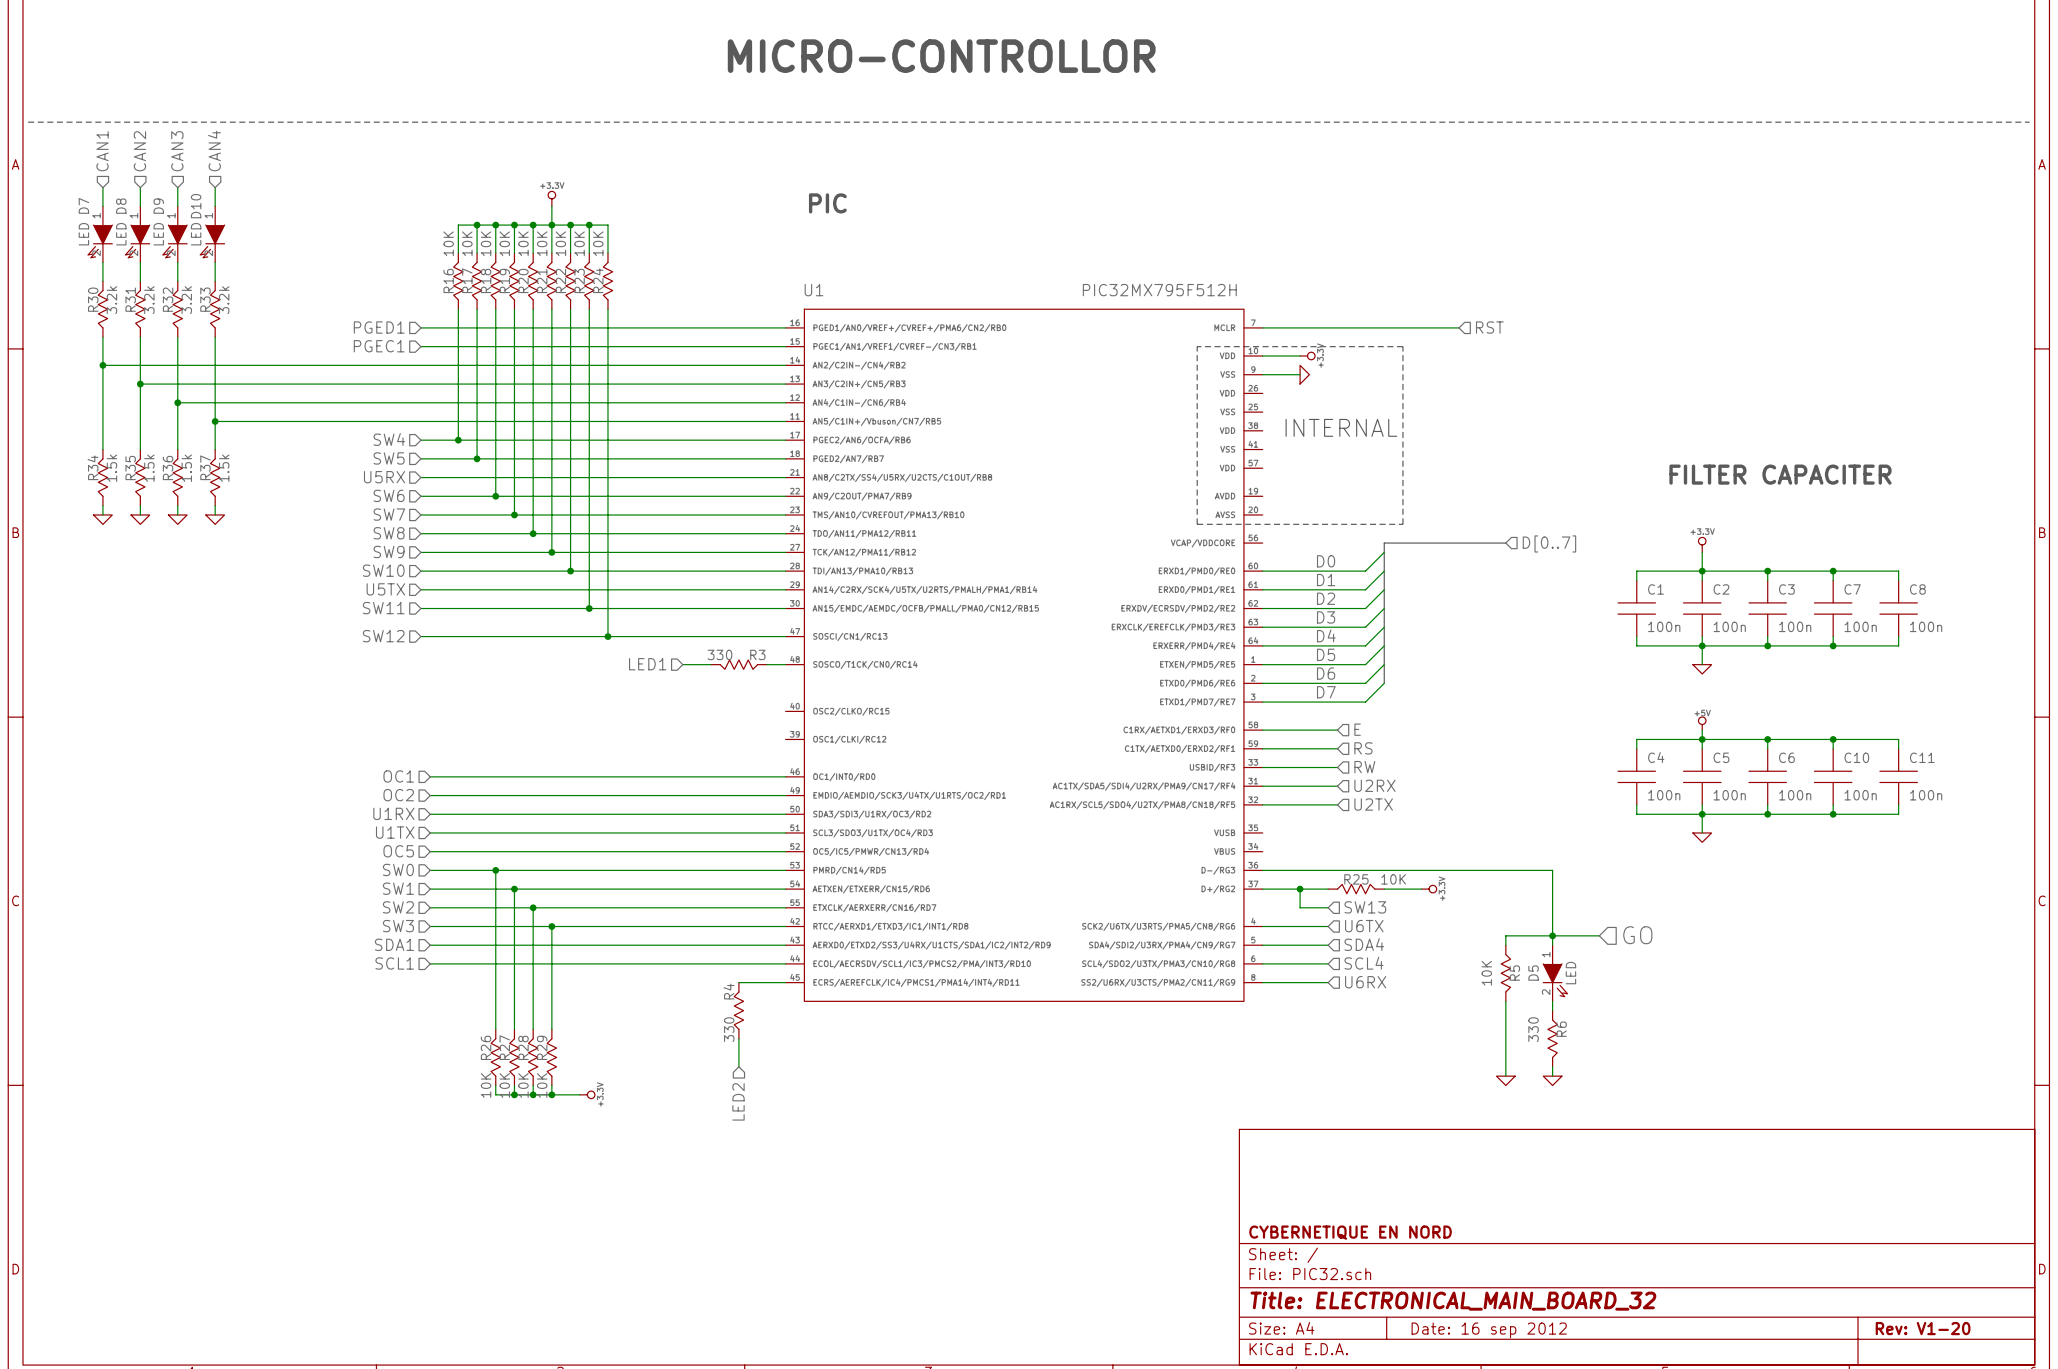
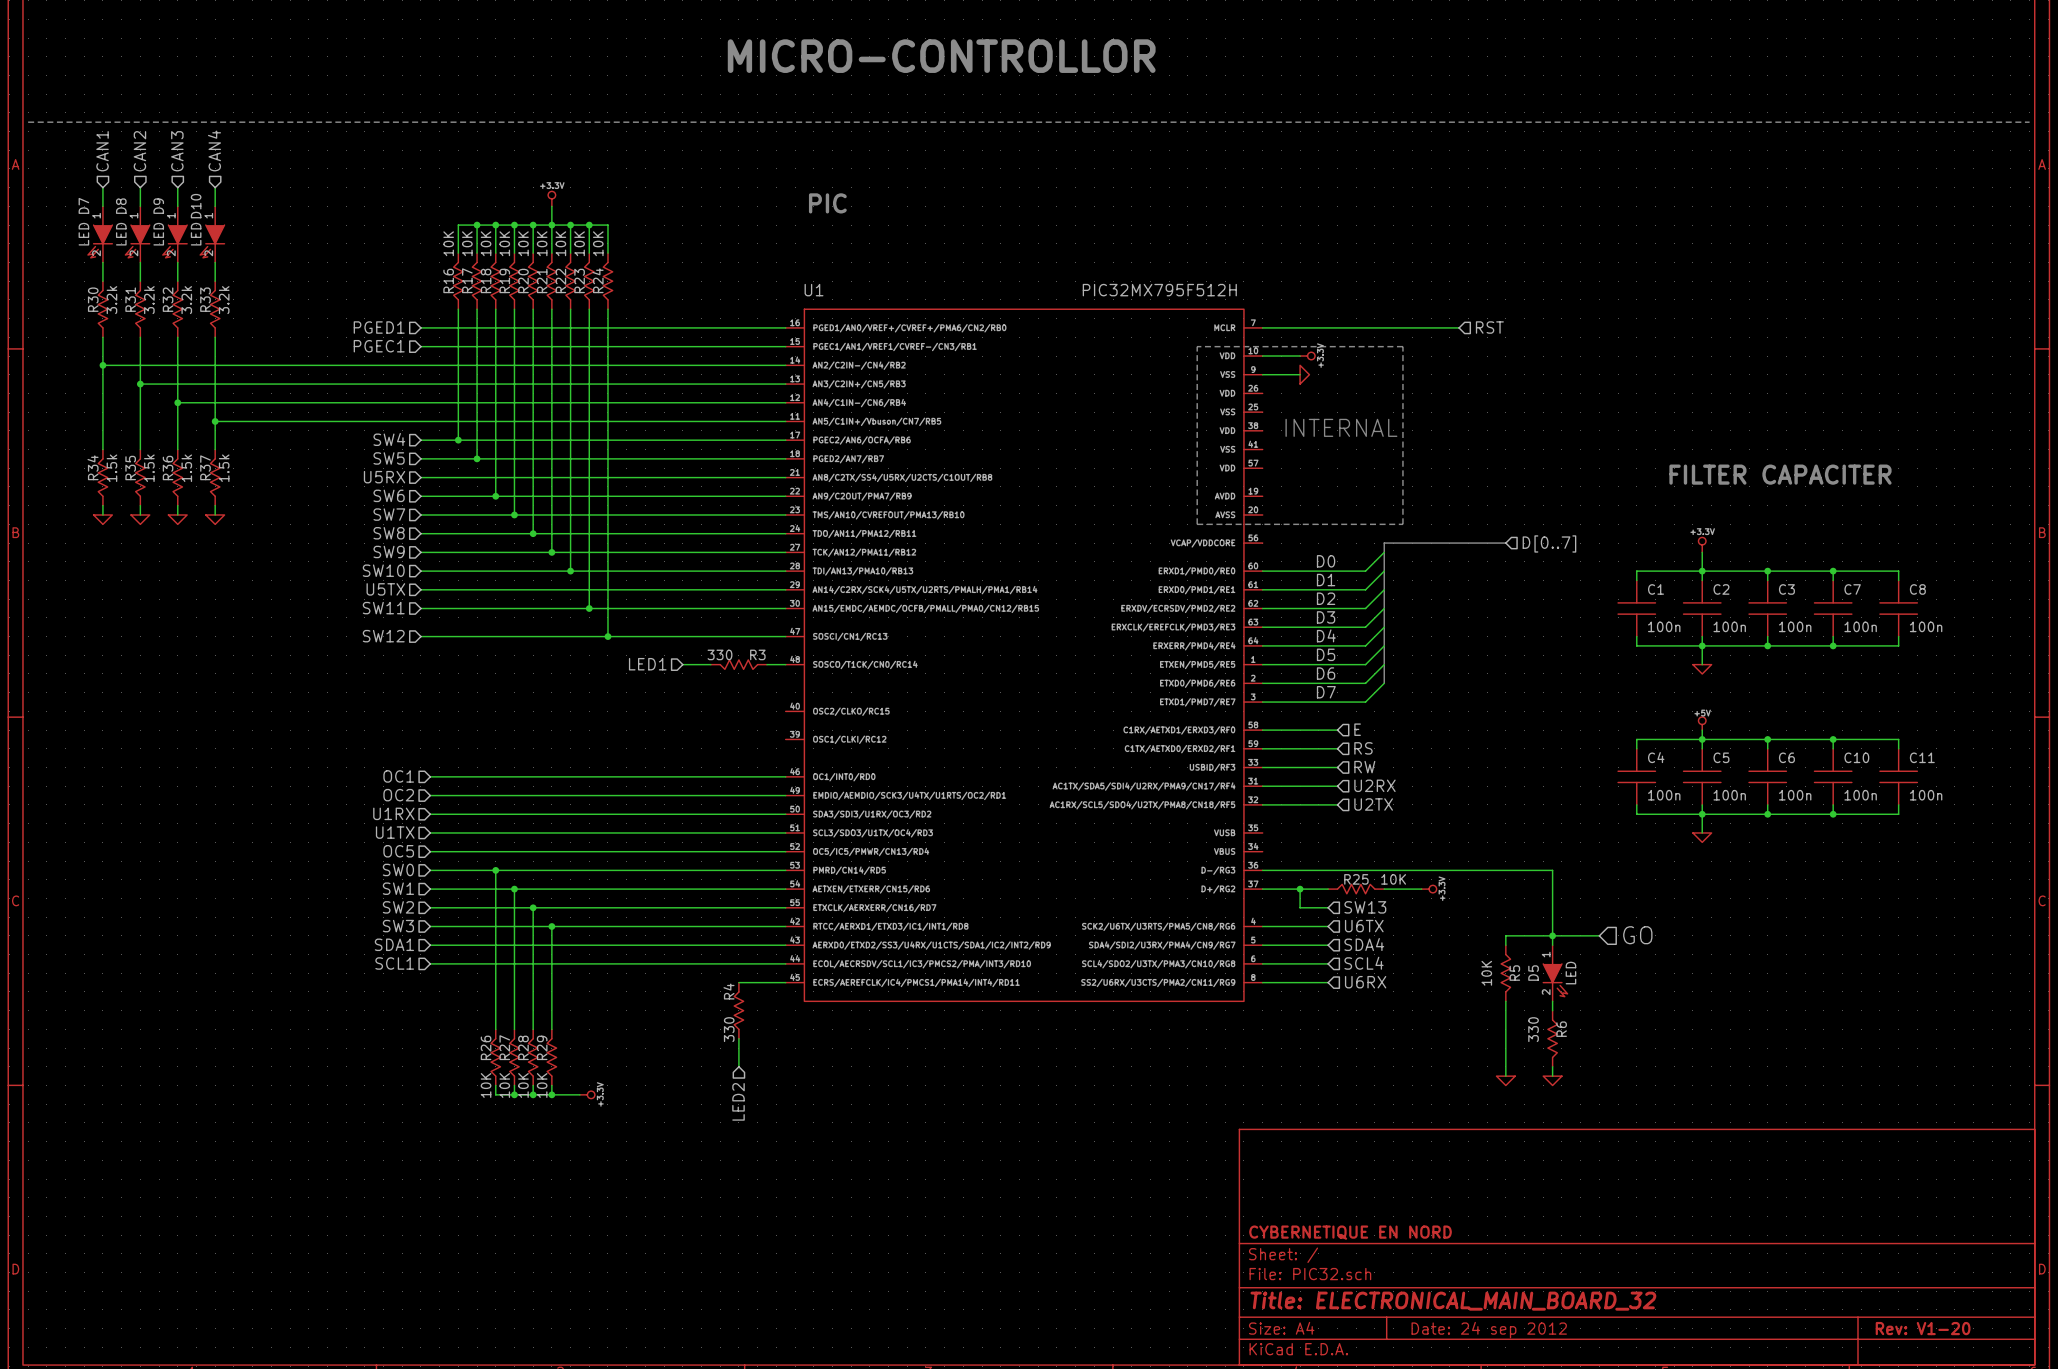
title block: Date: 16 sep 2012 (1489, 1330) -> Date: 24 sep 2012 (1489, 1330)

